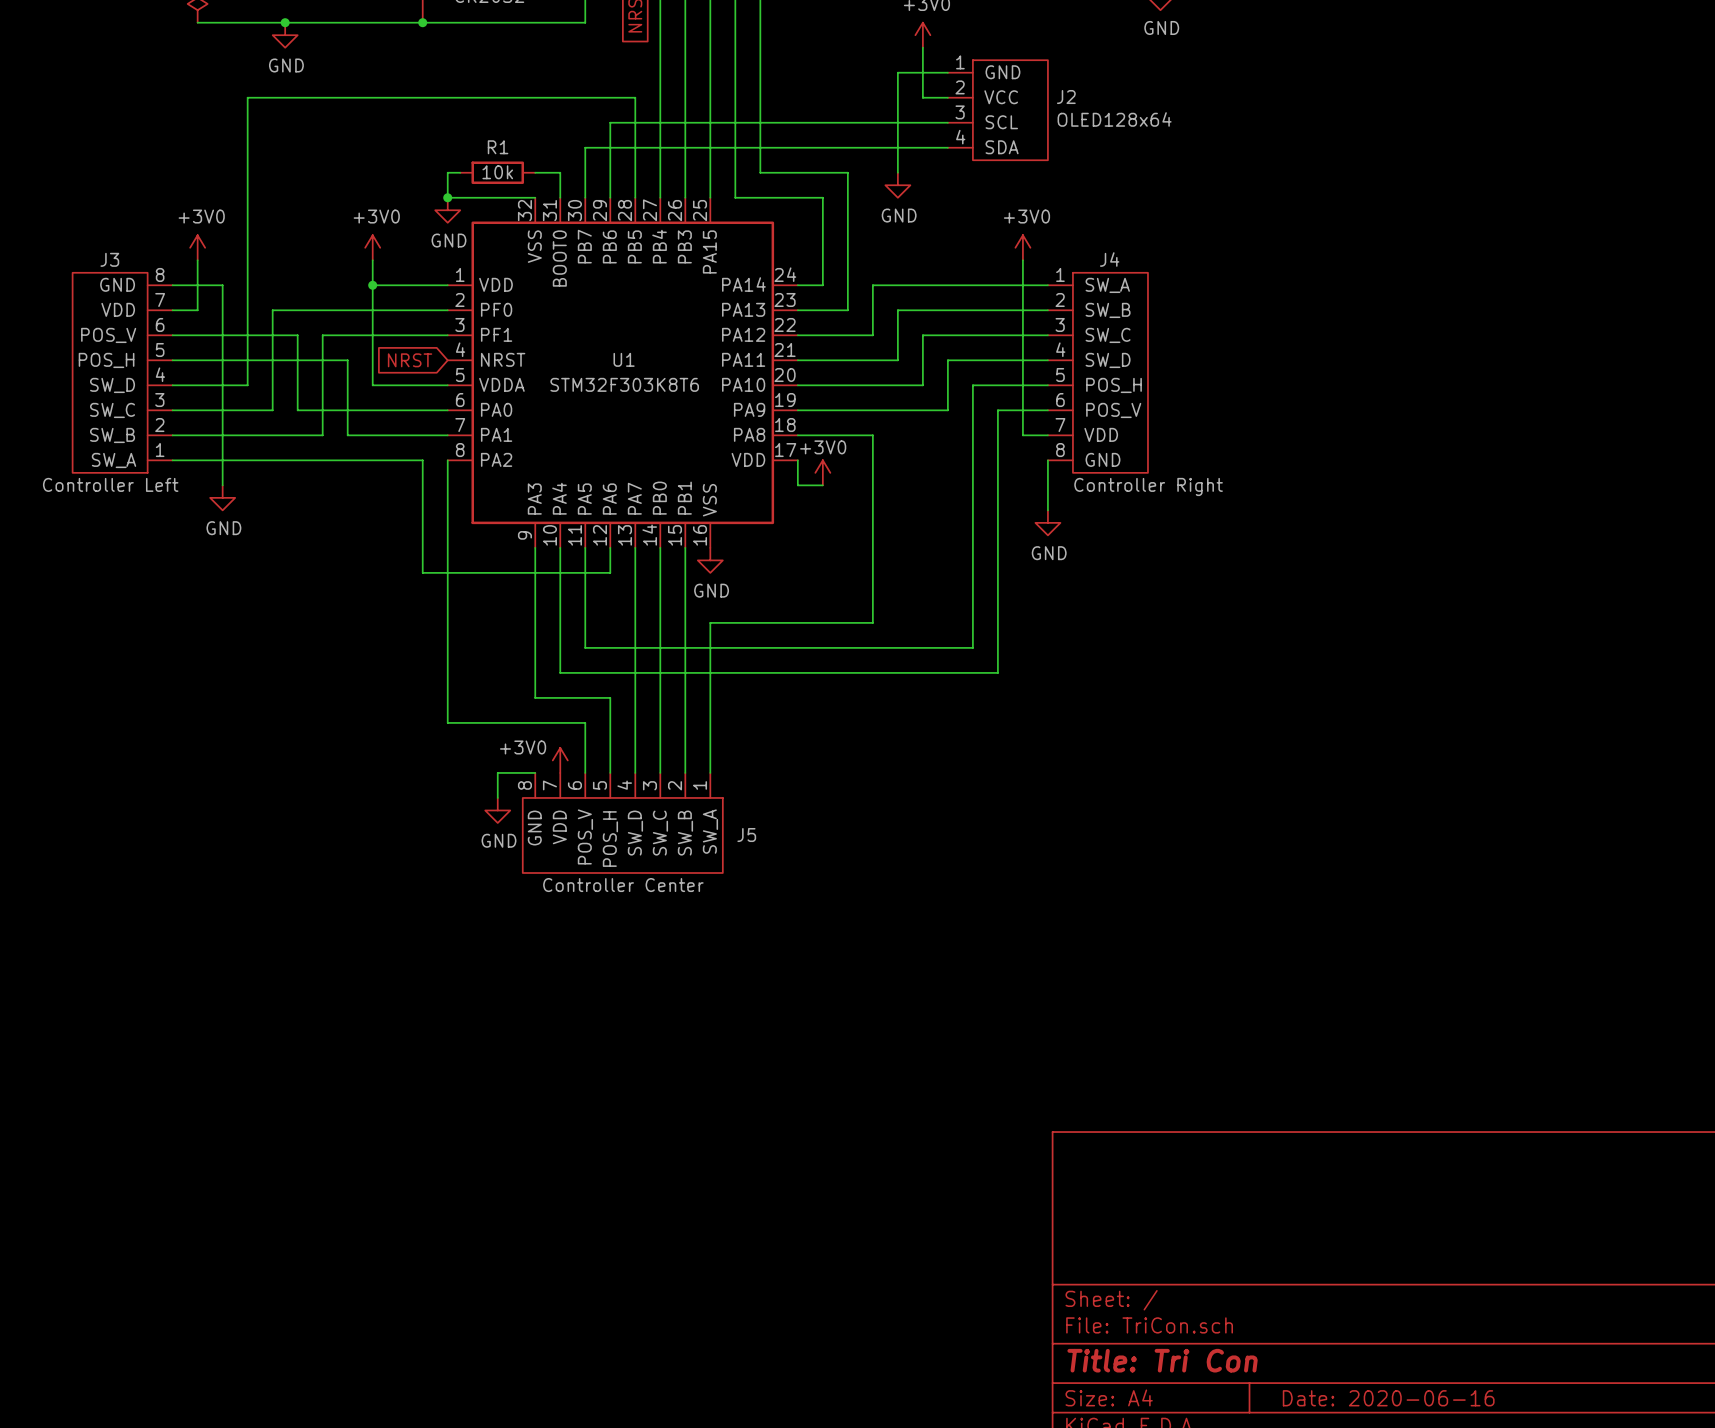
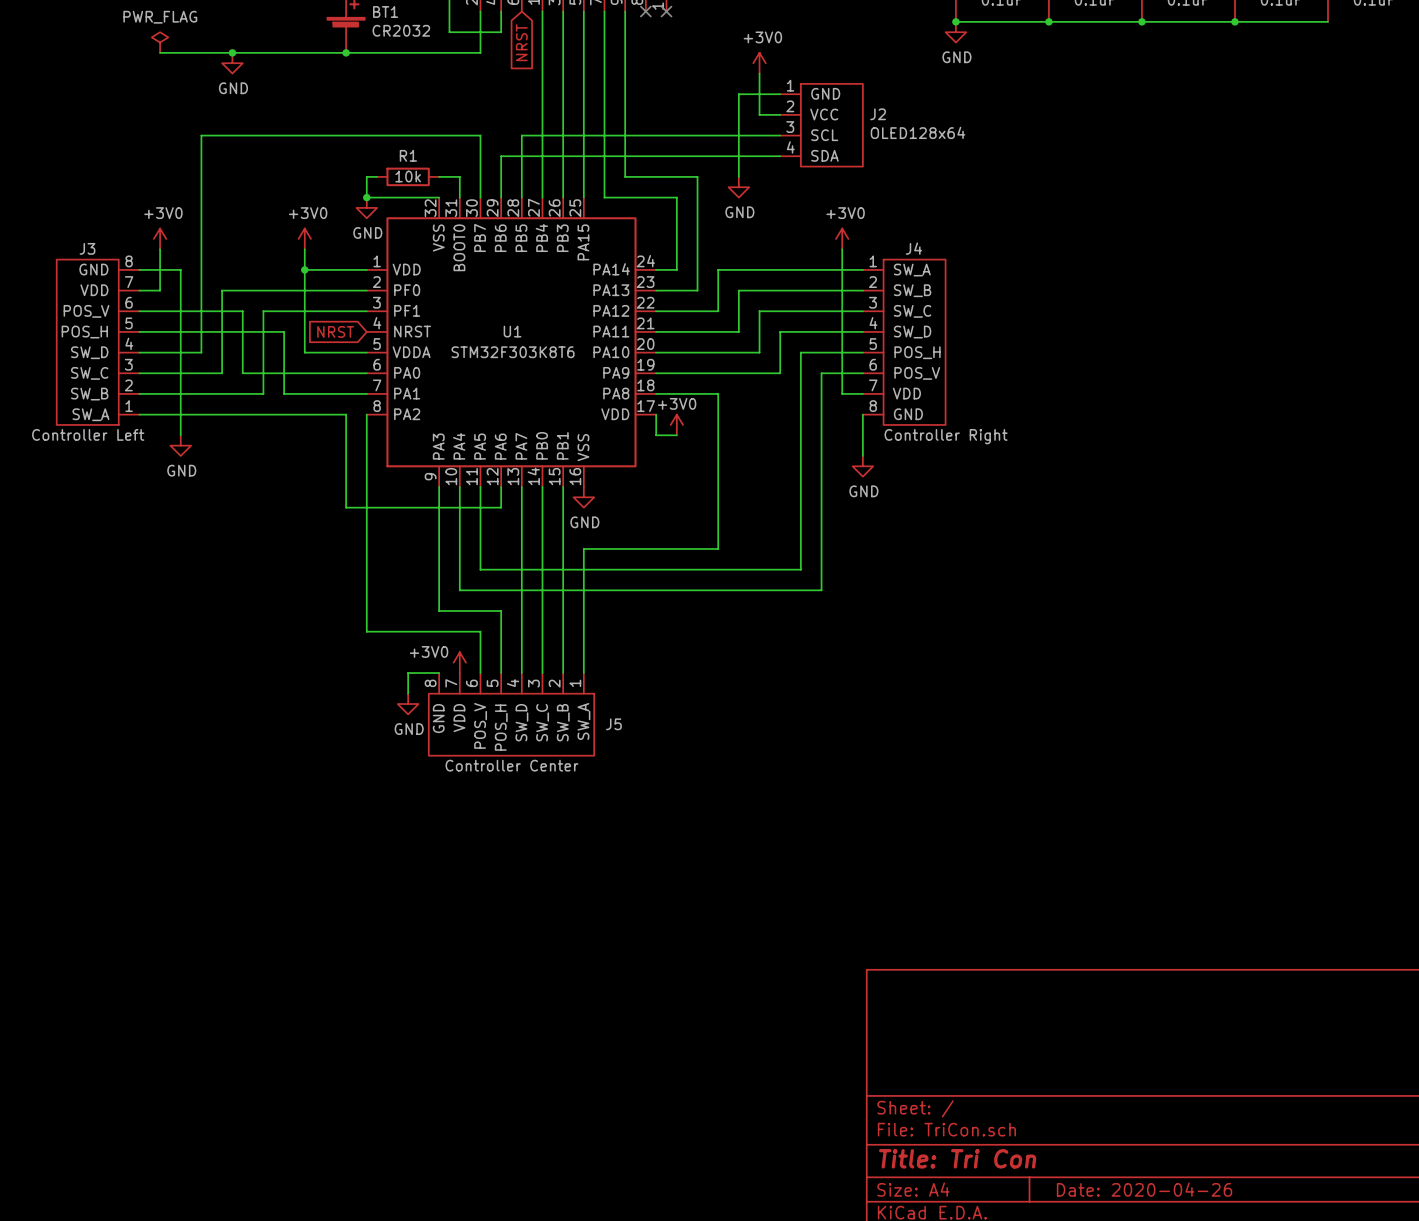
wire: (247, 122) (247, 97) (635, 97) (635, 122) (610, 122) (610, 147) (585, 147) -> (201, 135) (480, 135) (480, 156)
title block: Date: 2020-06-16 (1388, 1398) -> Date: 2020-04-26 (1144, 1189)

